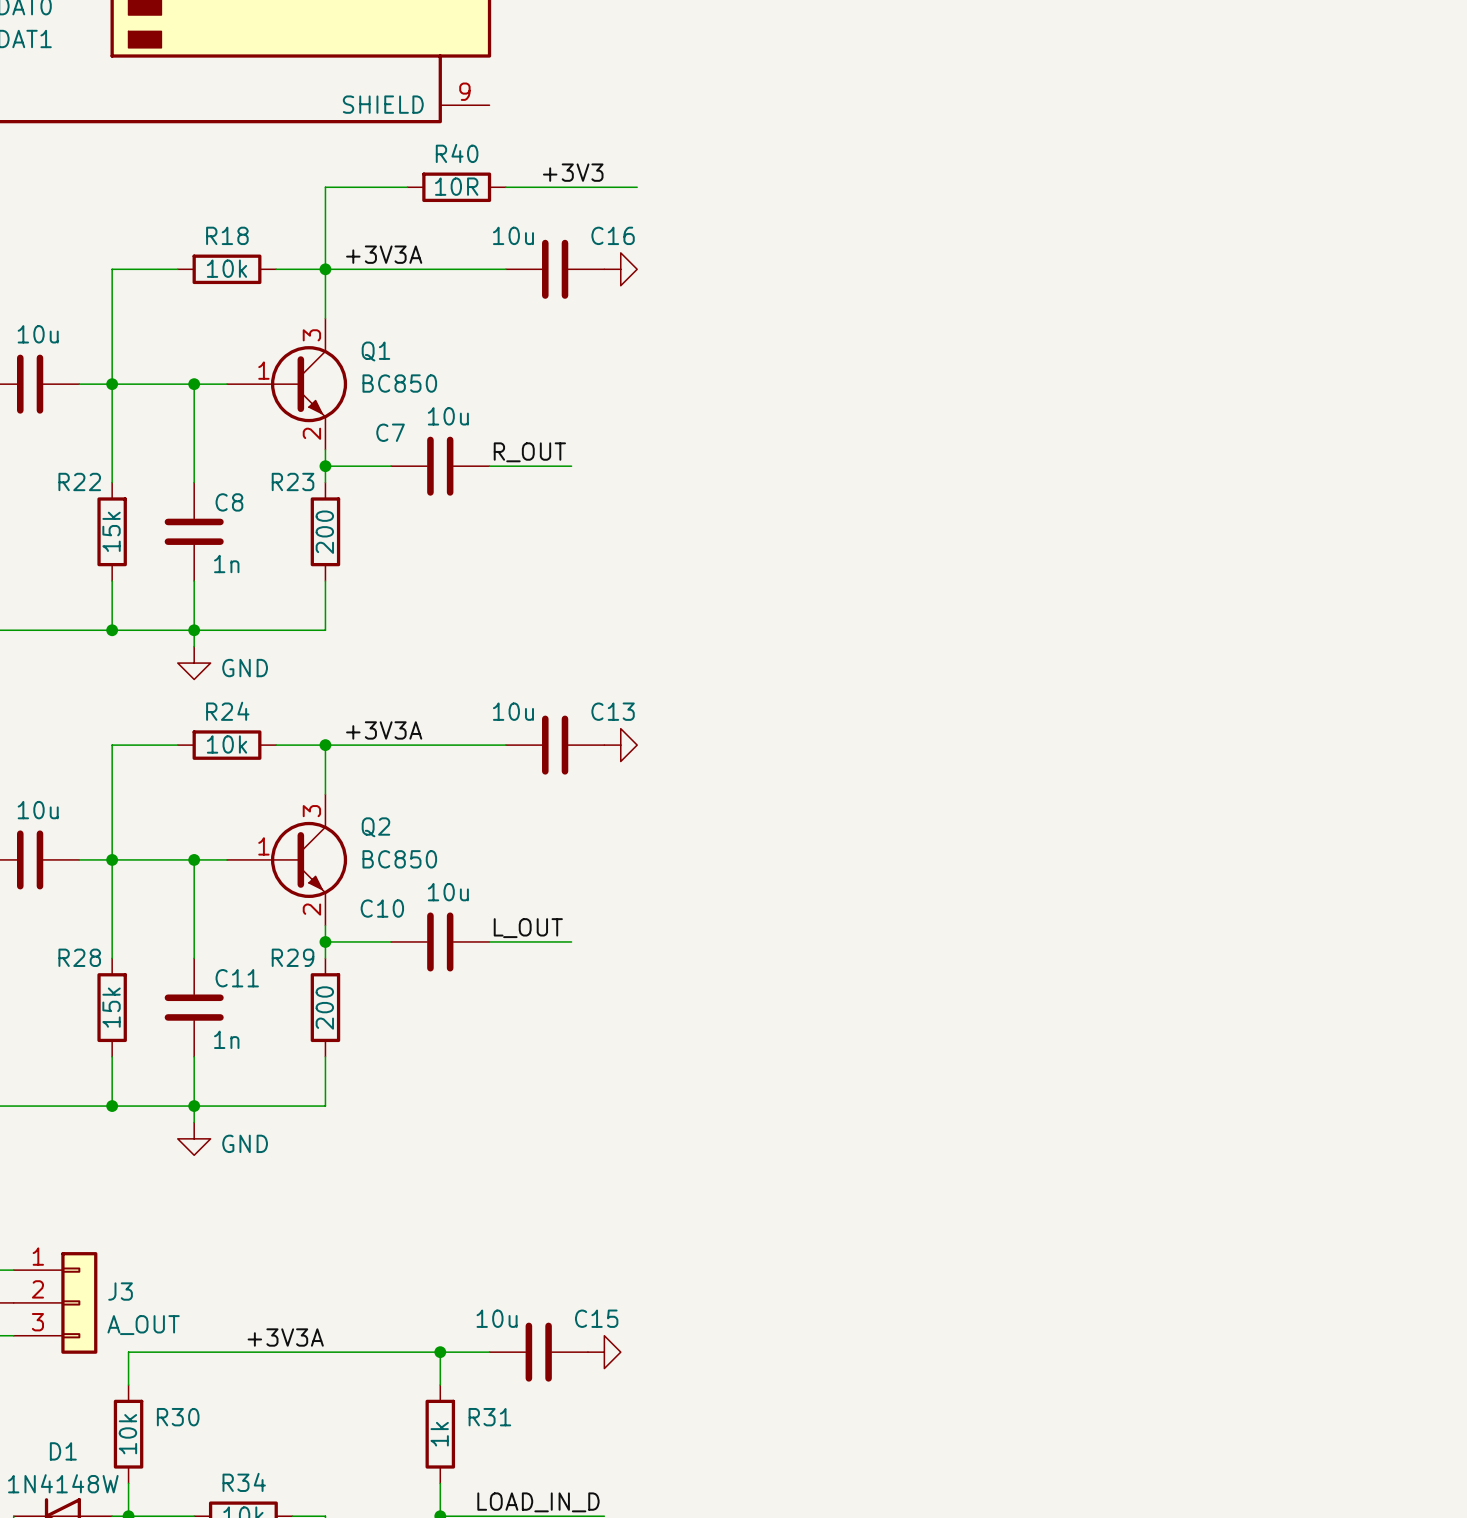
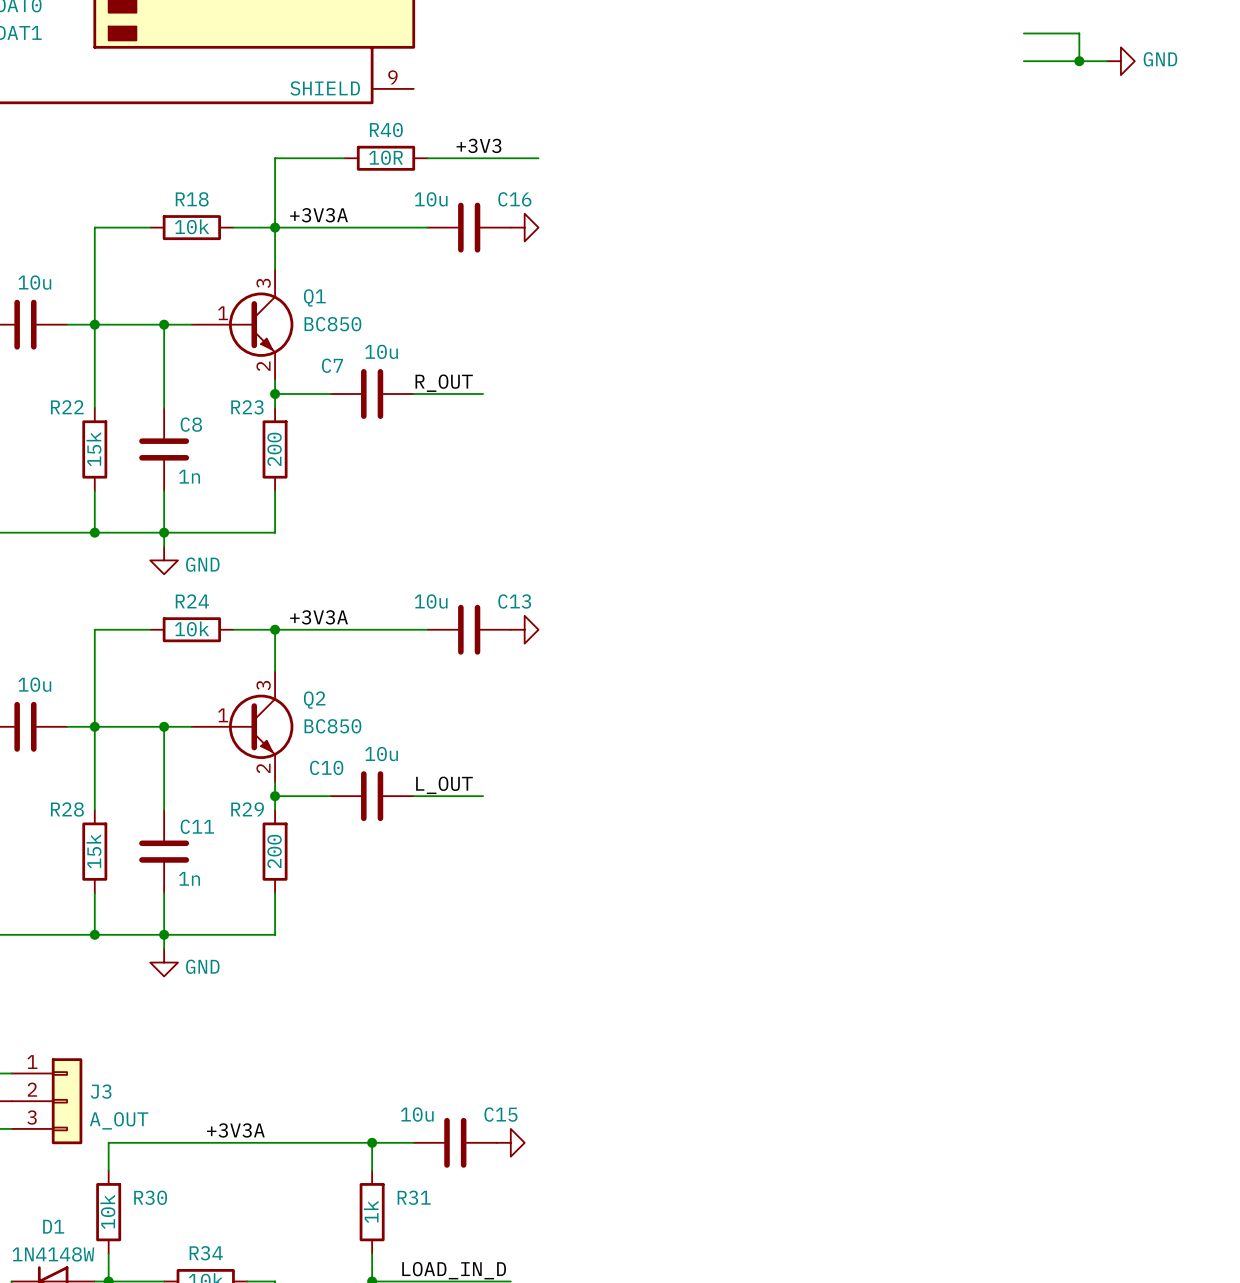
wire: none -> (1023, 33) (1079, 33) (1079, 61)
wire: none -> (1023, 61) (1107, 61)
junction: none -> (1079, 61)
power symbol: none -> GND (1120, 61)

